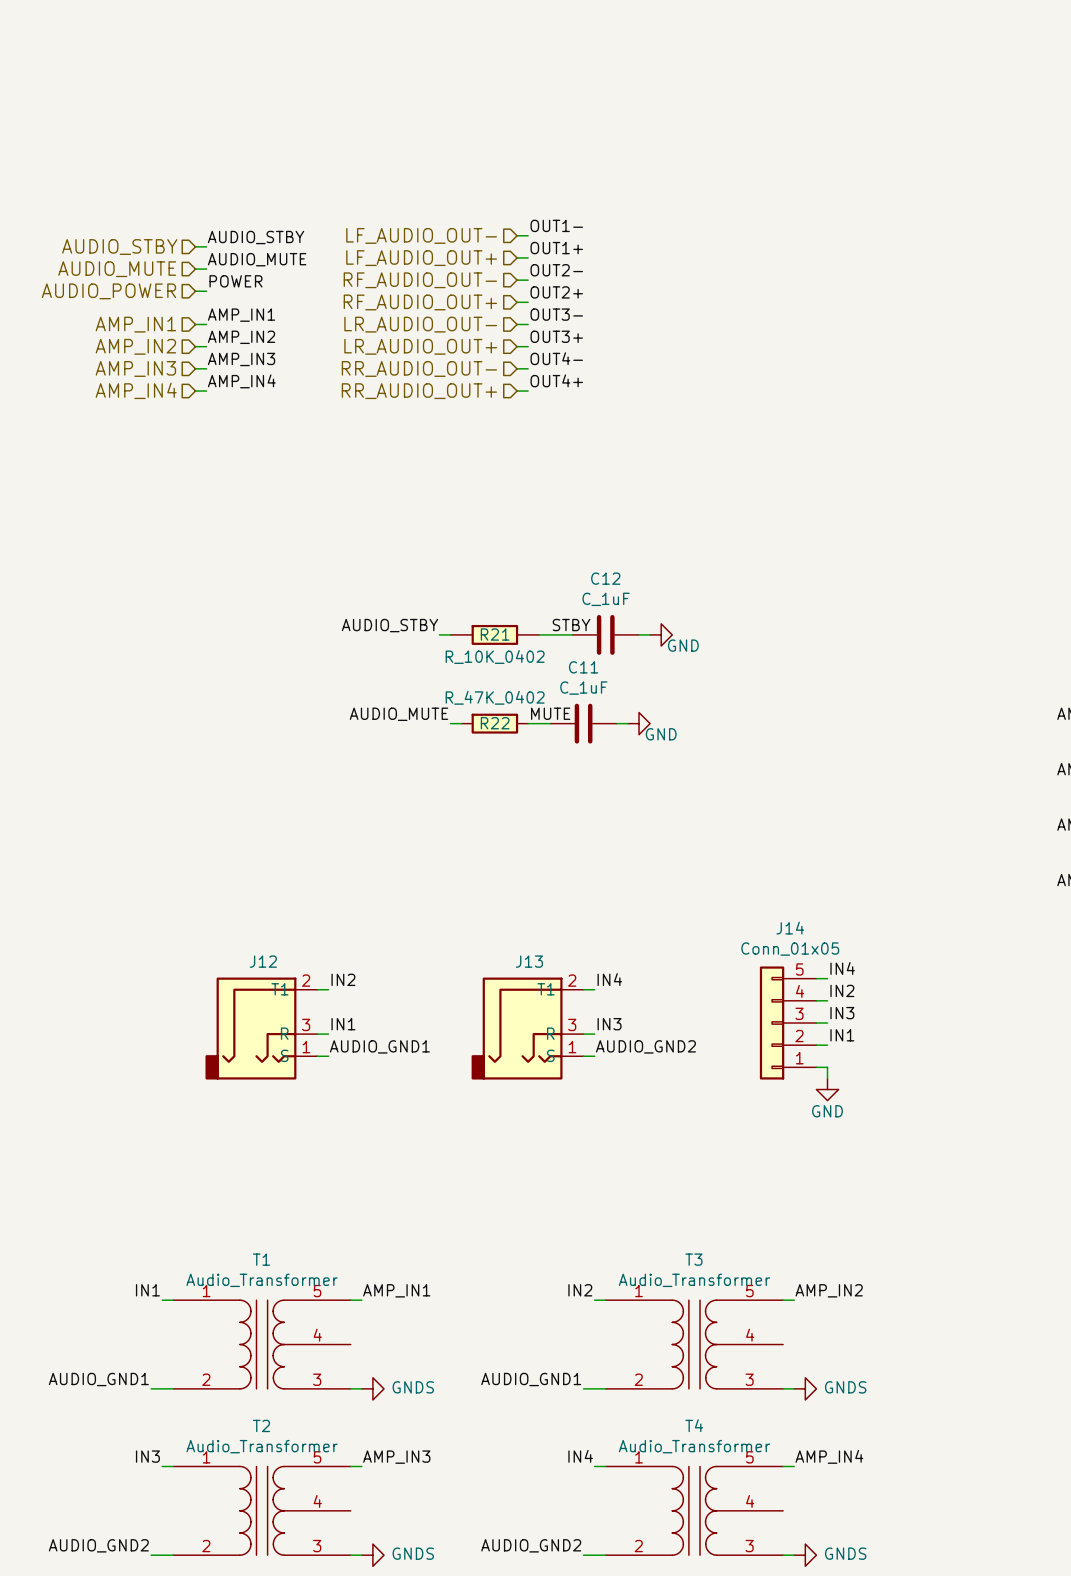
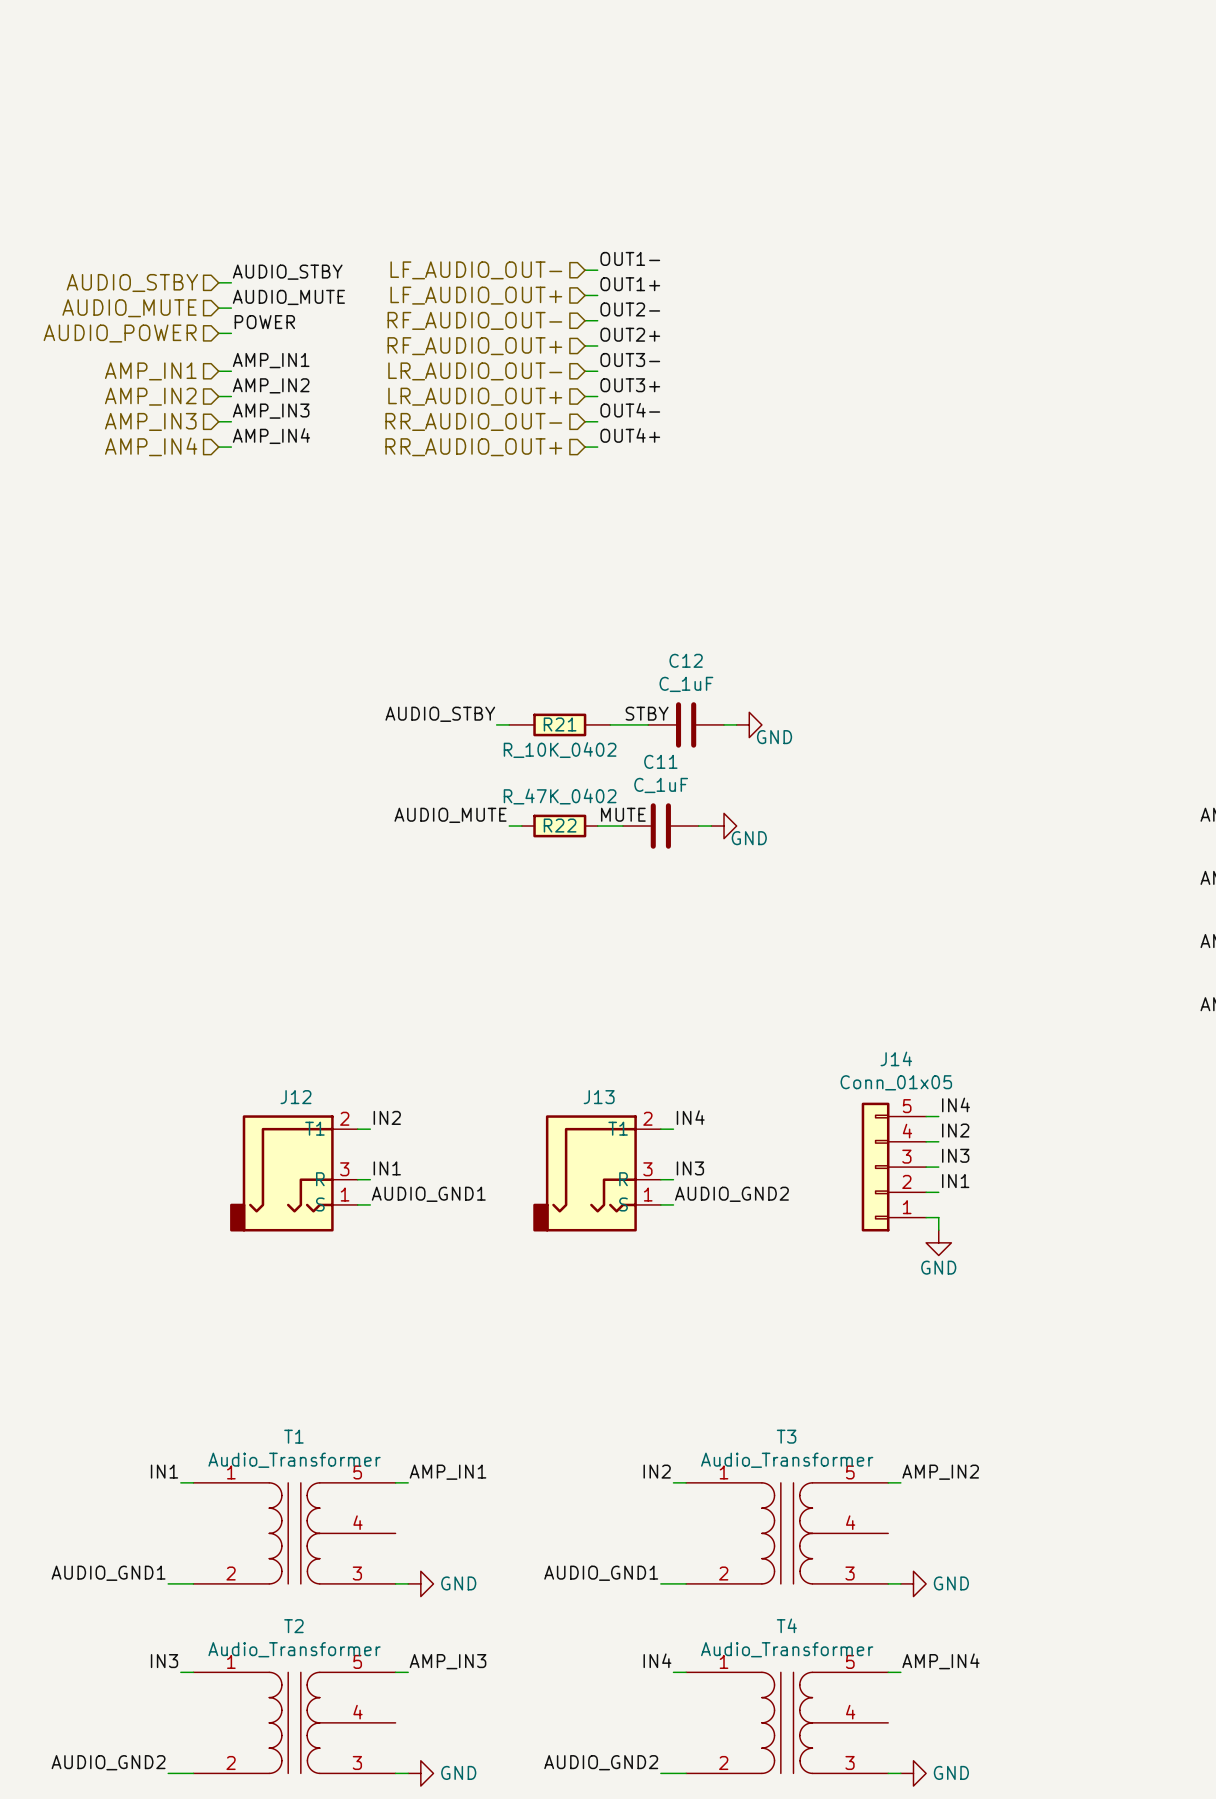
power symbol: GNDS (372, 1388) -> GND (420, 1583)
power symbol: GNDS (805, 1388) -> GND (913, 1583)
power symbol: GNDS (372, 1555) -> GND (420, 1773)
power symbol: GNDS (805, 1555) -> GND (913, 1773)

